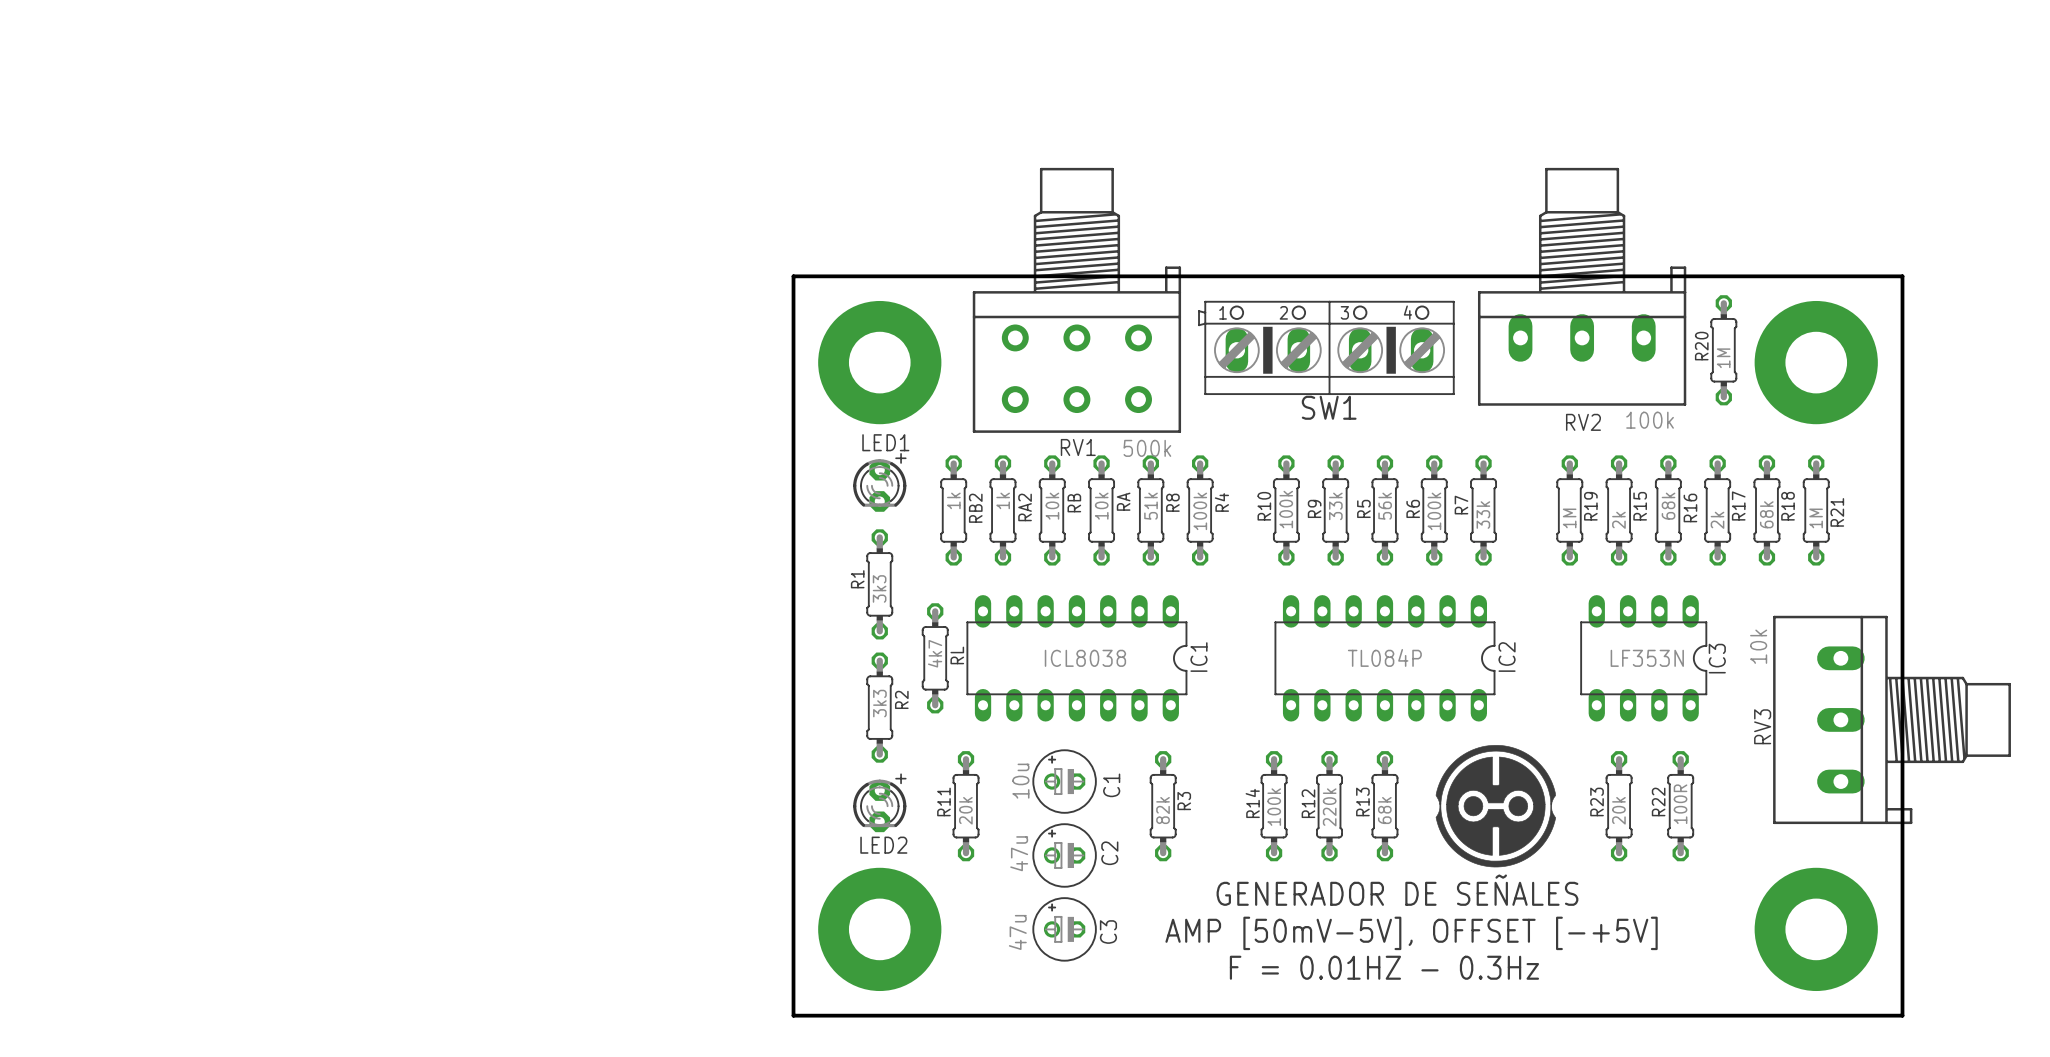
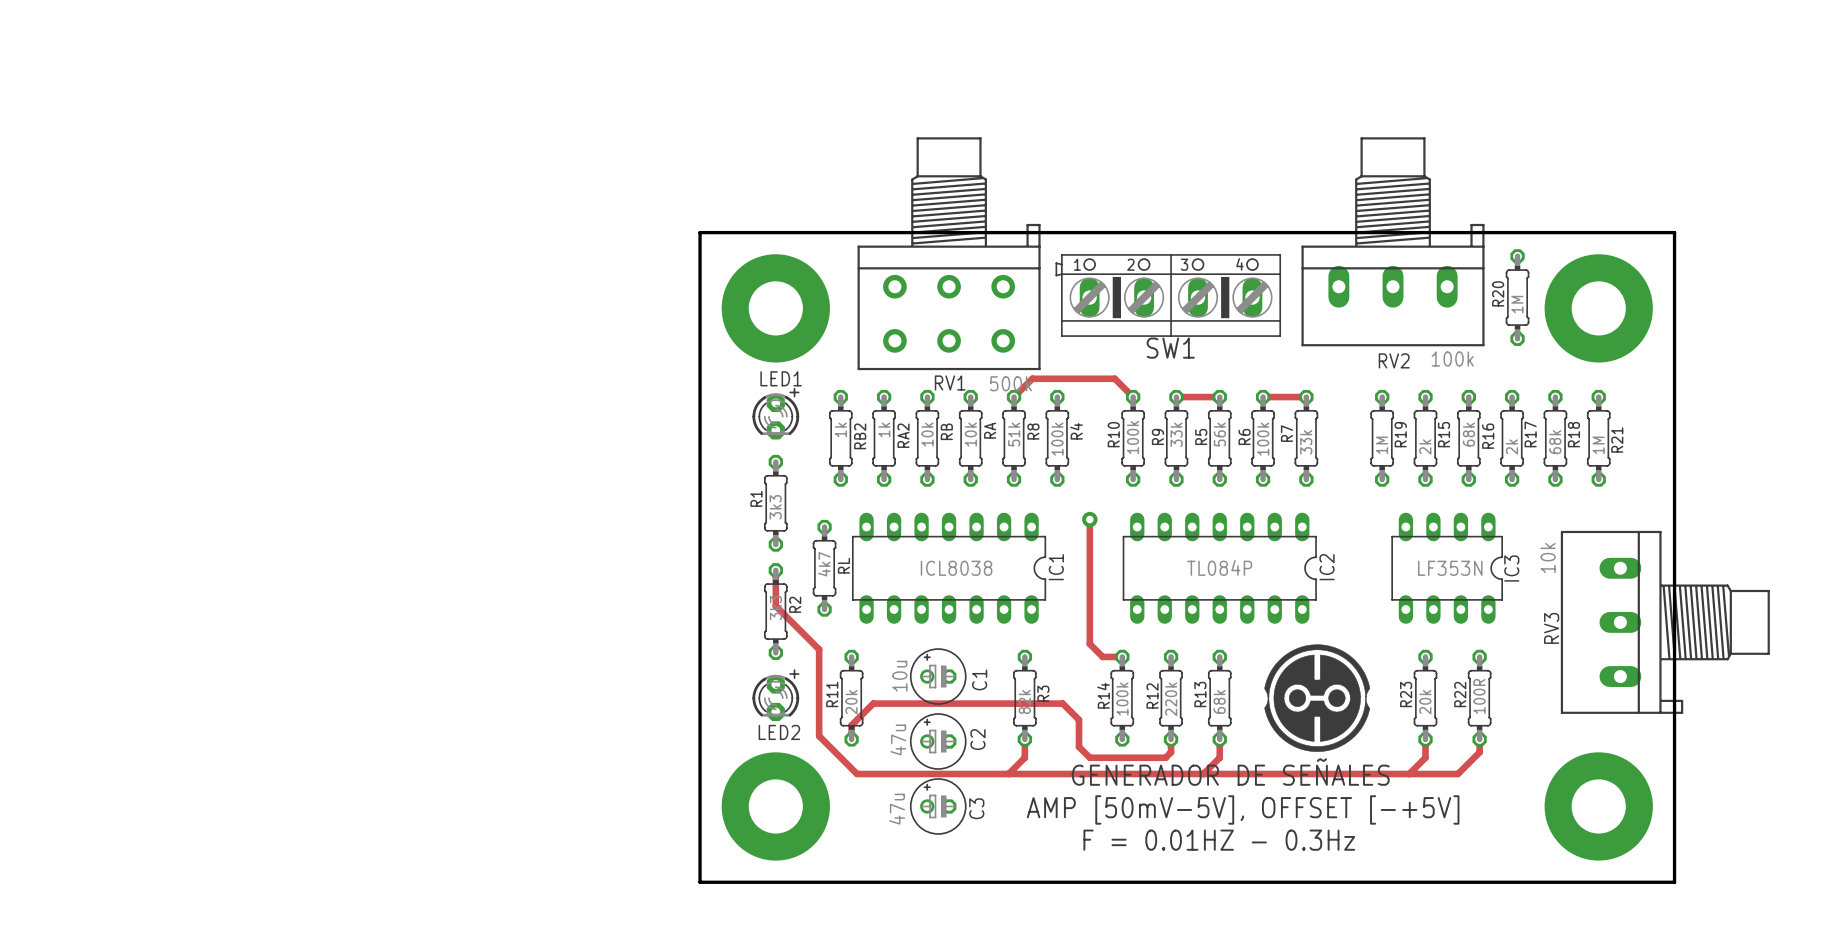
track: none -> (1014, 397) (1032, 378) (1114, 378) (1133, 397)
track: none -> (1176, 397) (1219, 397)
track: none -> (1263, 397) (1306, 397)
track: none -> (1089, 519) (1089, 644) (1102, 656) (1122, 656)
via: none -> (1089, 519)
track: none -> (775, 570) (775, 606) (819, 649) (819, 736) (857, 773) (1457, 773) (1479, 752) (1479, 739)
track: none -> (851, 739) (851, 725) (873, 703) (1062, 703) (1079, 719) (1079, 746) (1089, 757) (1165, 757) (1171, 752) (1171, 739)
track: none -> (1024, 739) (1024, 757) (1008, 773)
track: none -> (1219, 739) (1219, 757) (1203, 773)
track: none -> (1425, 739) (1425, 757) (1409, 773)

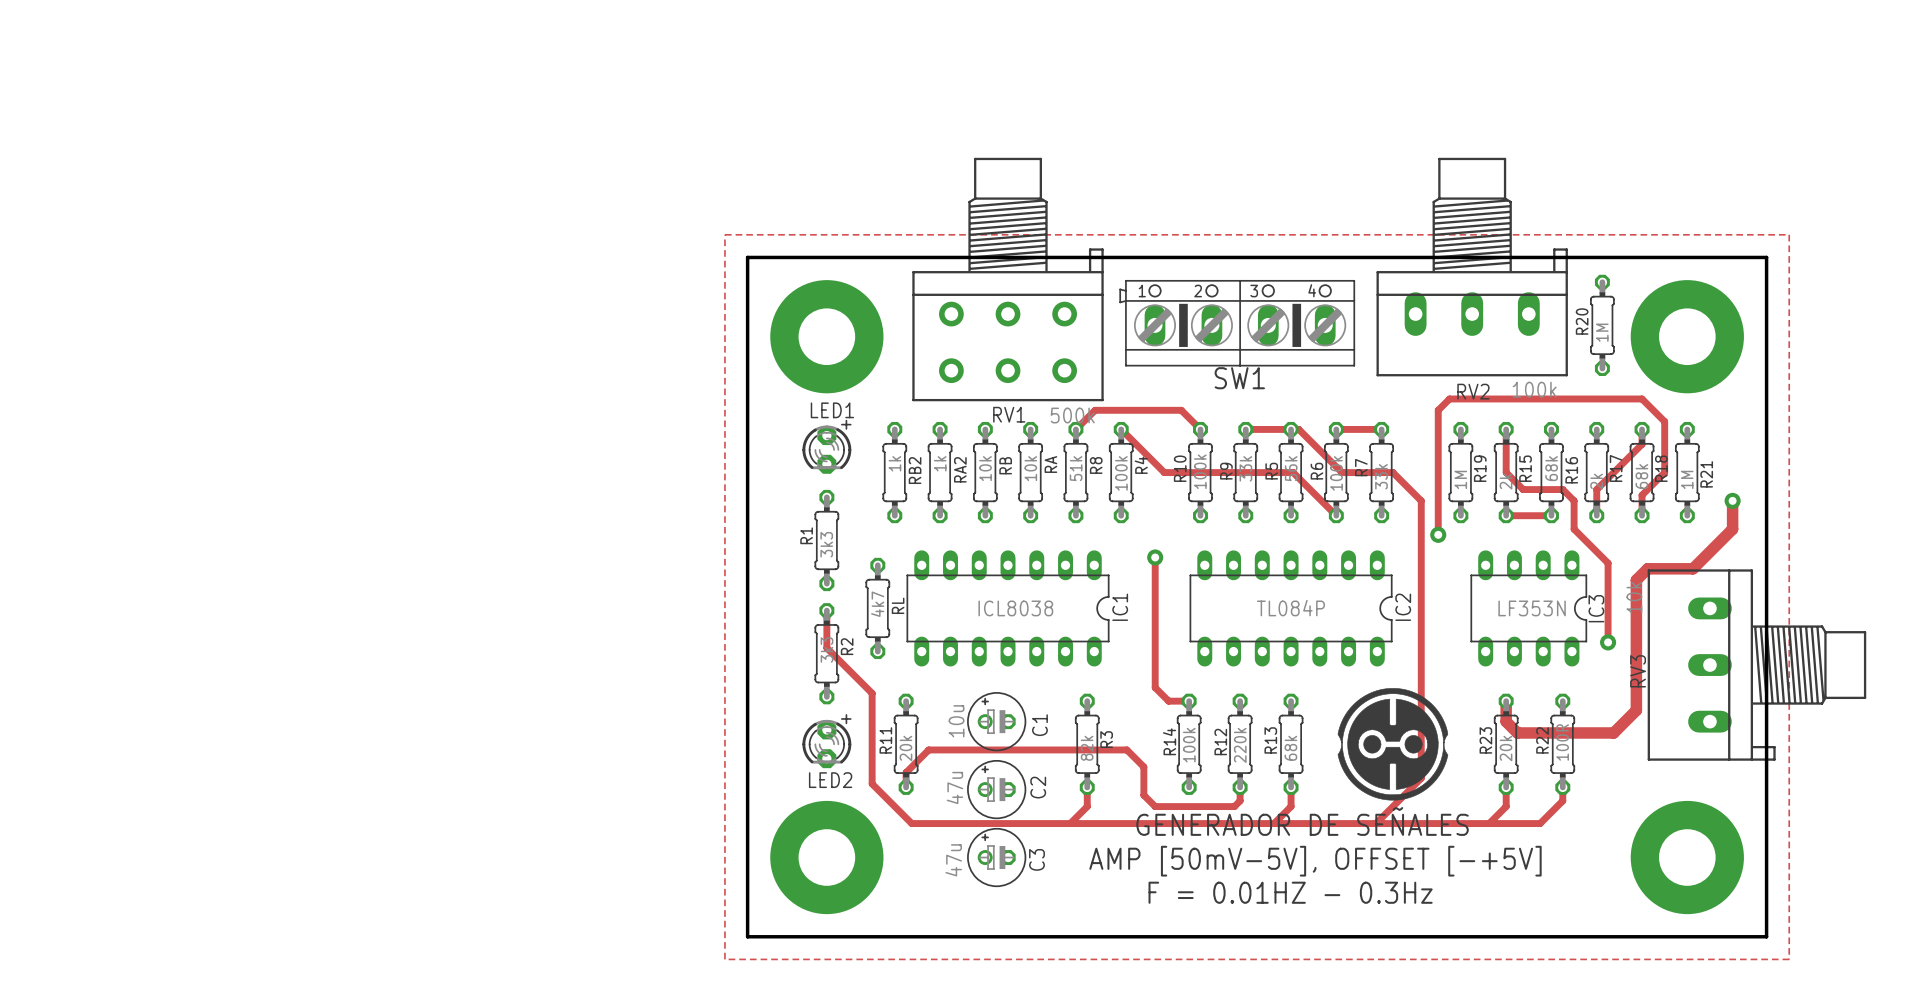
zone outline: none -> (724, 234) (724, 959) (1789, 959) (1789, 234) (724, 234)
track: none -> (1121, 429) (1164, 472) (1293, 472) (1336, 515)
track: none -> (1291, 429) (1298, 429) (1342, 472) (1392, 472) (1421, 500) (1421, 778) (1375, 823)
track: none -> (1506, 429) (1506, 472) (1523, 489) (1562, 489) (1574, 500) (1574, 529) (1608, 563) (1608, 642)
track: none -> (1642, 429) (1642, 444) (1596, 489) (1596, 515)
track: none -> (1732, 500) (1732, 529) (1692, 568) (1647, 568) (1636, 580) (1636, 710) (1613, 732) (1517, 732) (1506, 721) (1506, 701)
via: none -> (1732, 500)
track: none -> (1506, 515) (1551, 515)
track: none -> (1642, 515) (1642, 495) (1664, 472) (1664, 421) (1642, 398) (1449, 398) (1438, 410) (1438, 534)
via: none -> (1438, 534)
via: none -> (1608, 642)

